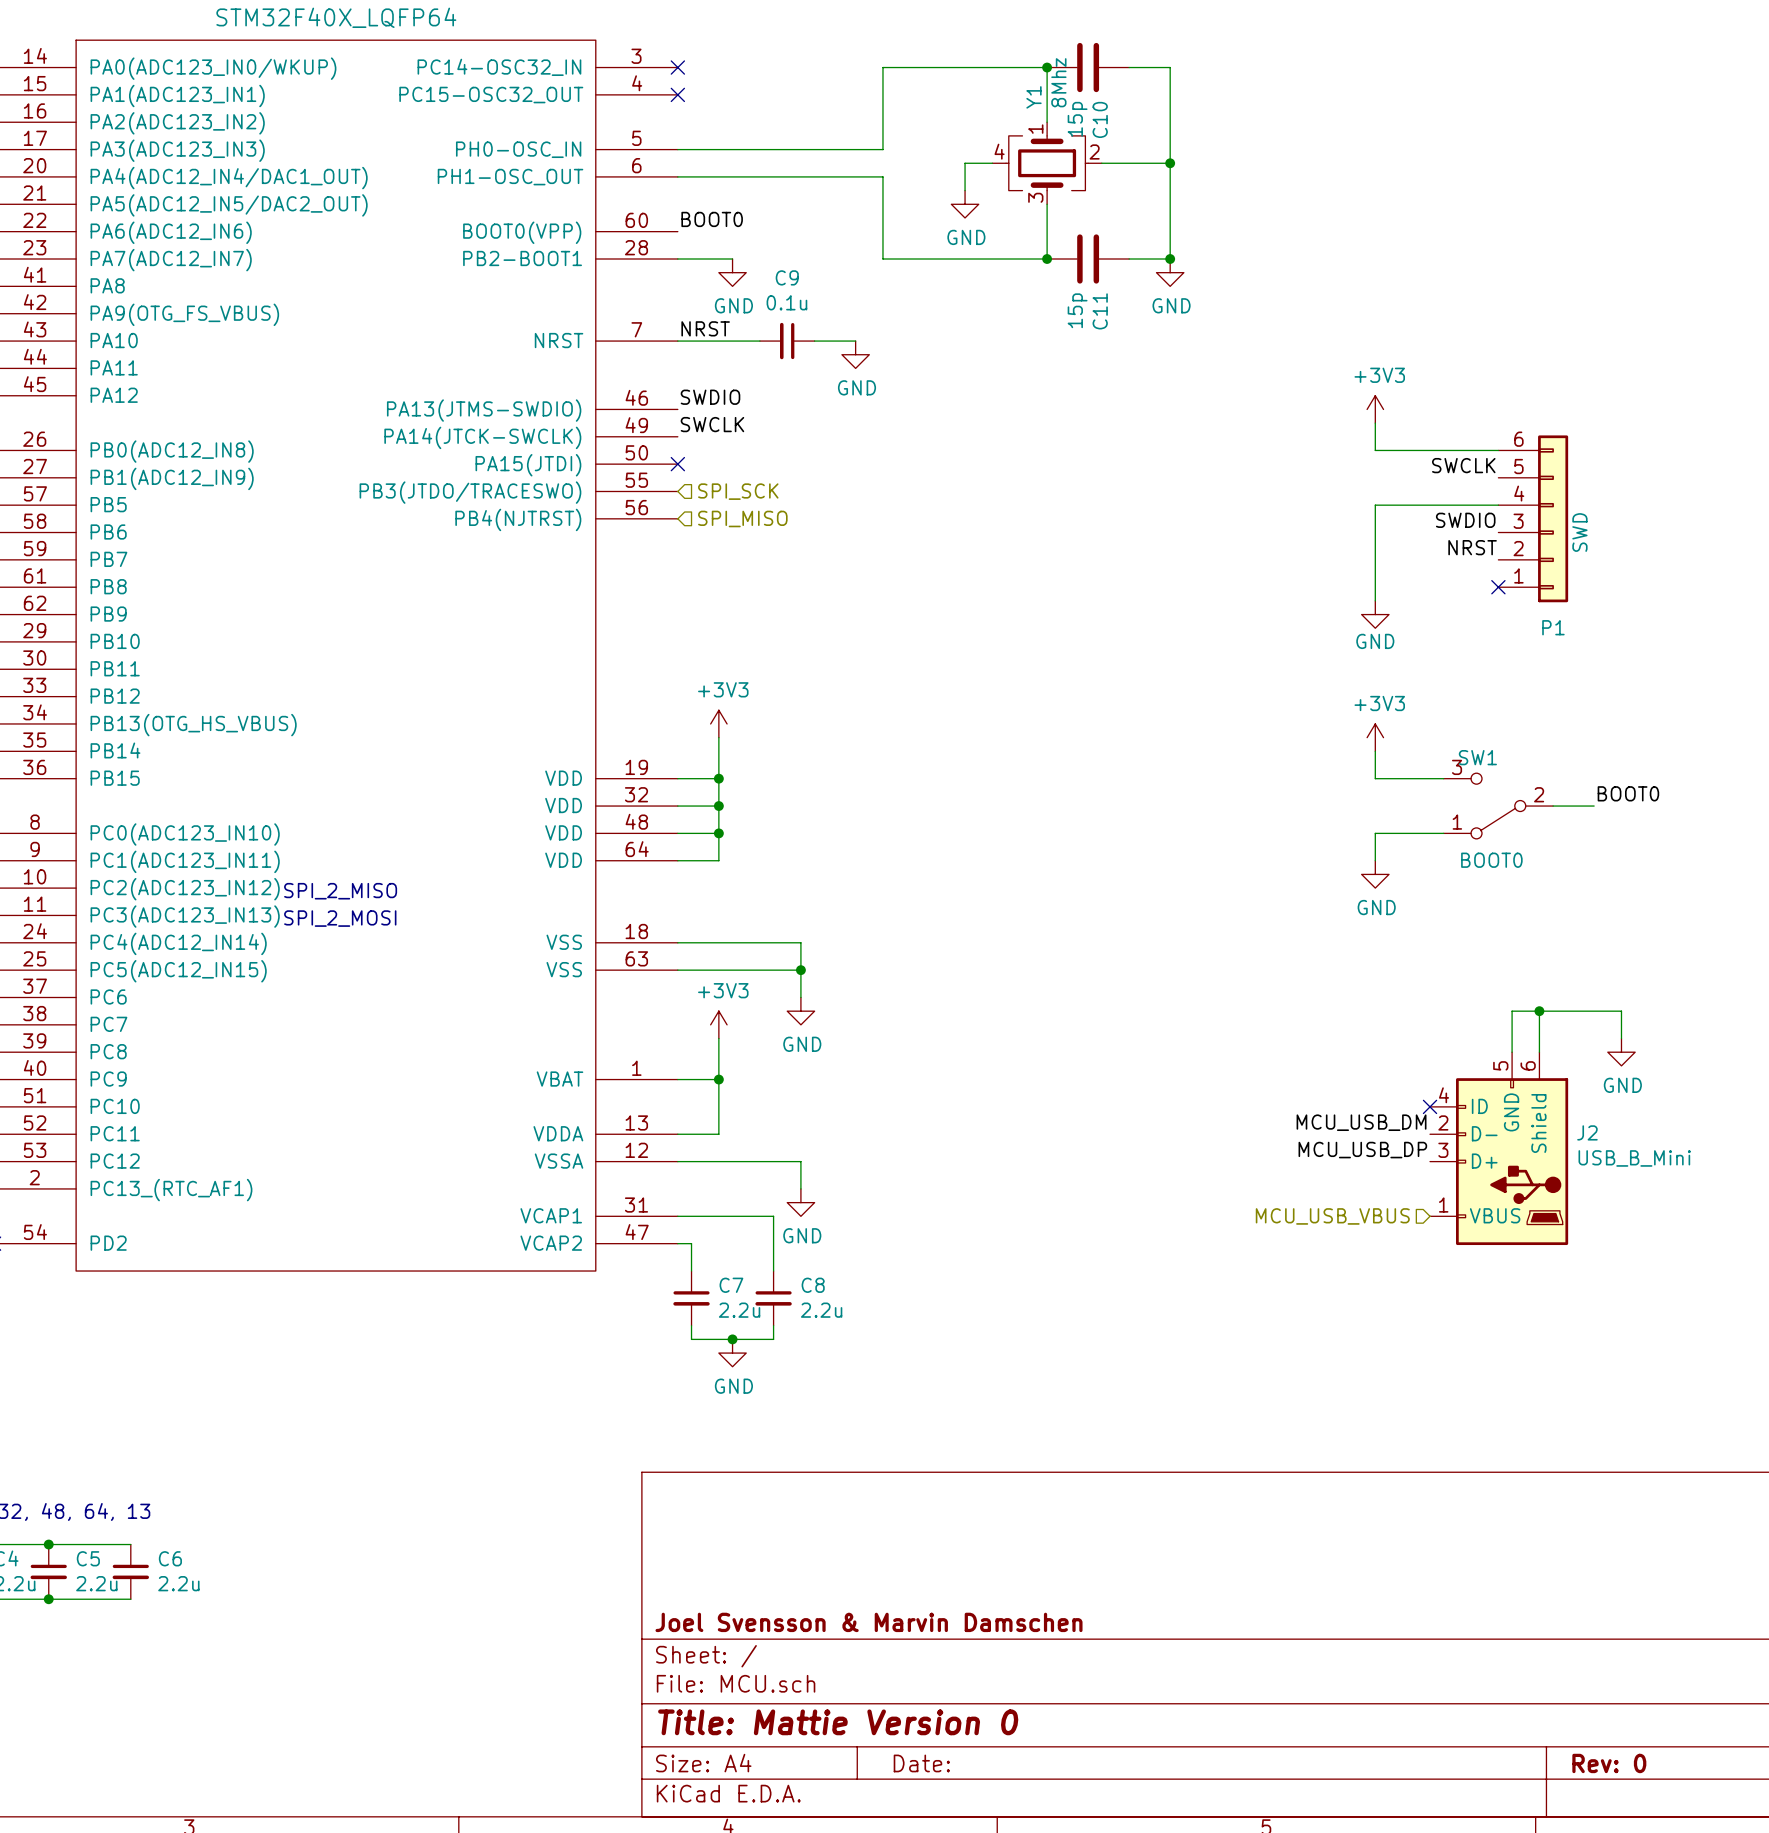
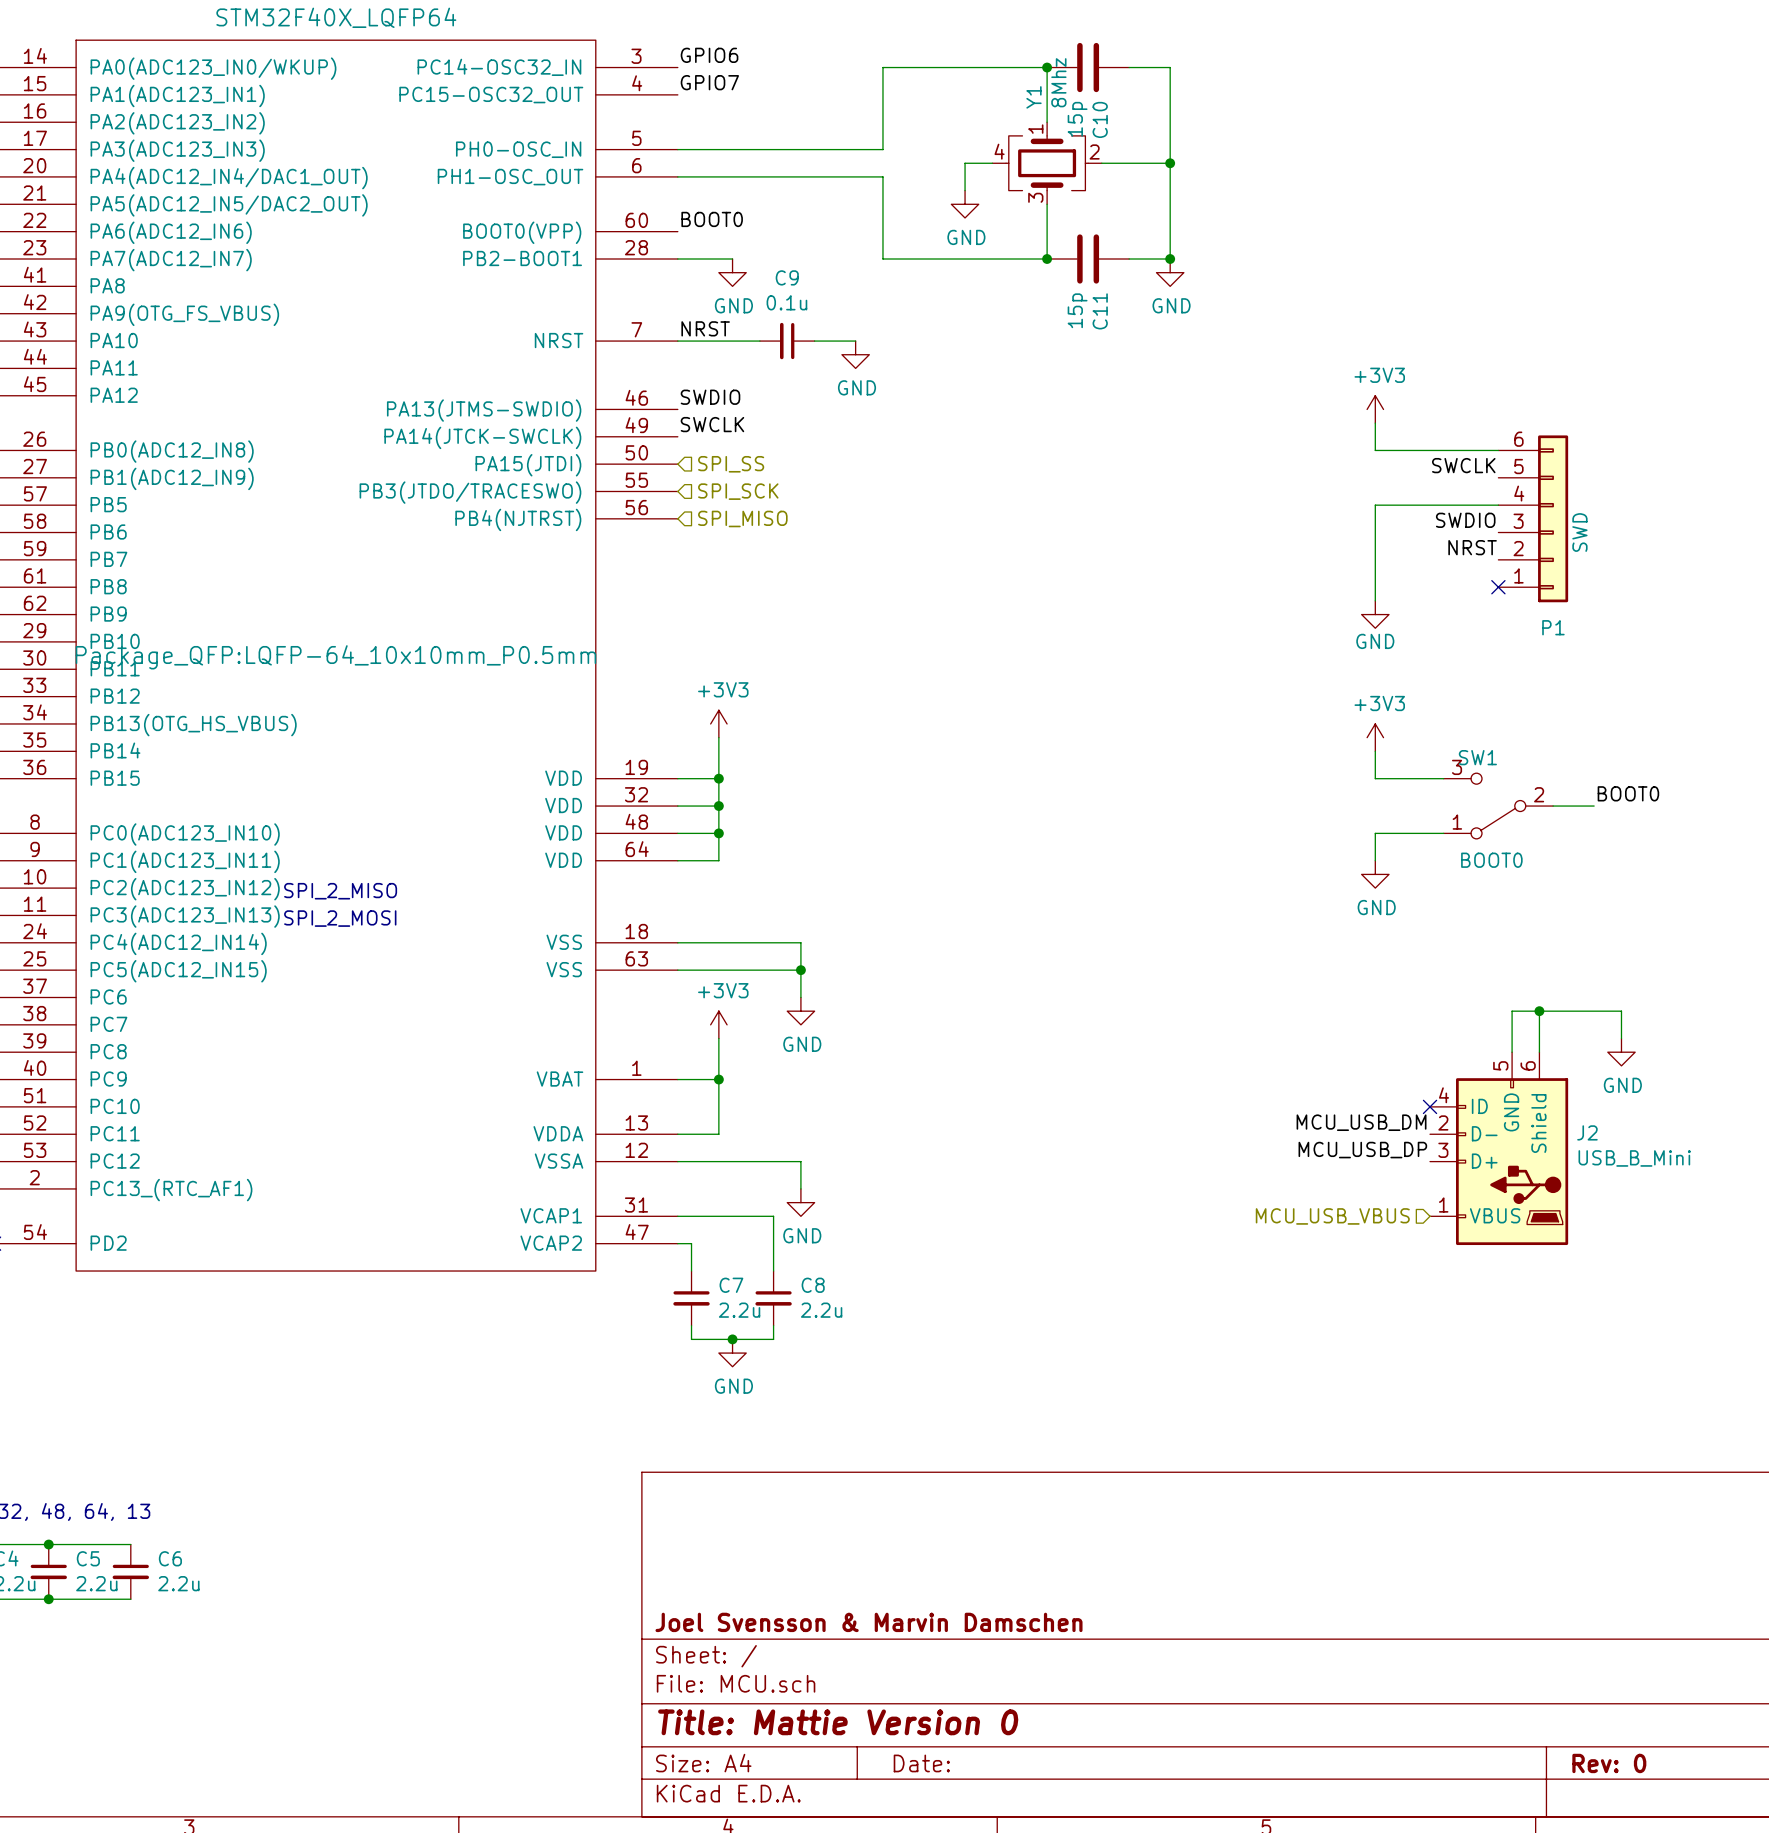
label: none -> GPIO6 (709, 55)
no-connect mark: (677, 67) -> none
label: none -> GPIO7 (709, 82)
no-connect mark: (677, 94) -> none
no-connect mark: (677, 464) -> none
hierarchical label: none -> SPI_SS (731, 464)
part text: none -> Package_QFP:LQFP-64_10x10mm_P0.5mm (335, 657)

